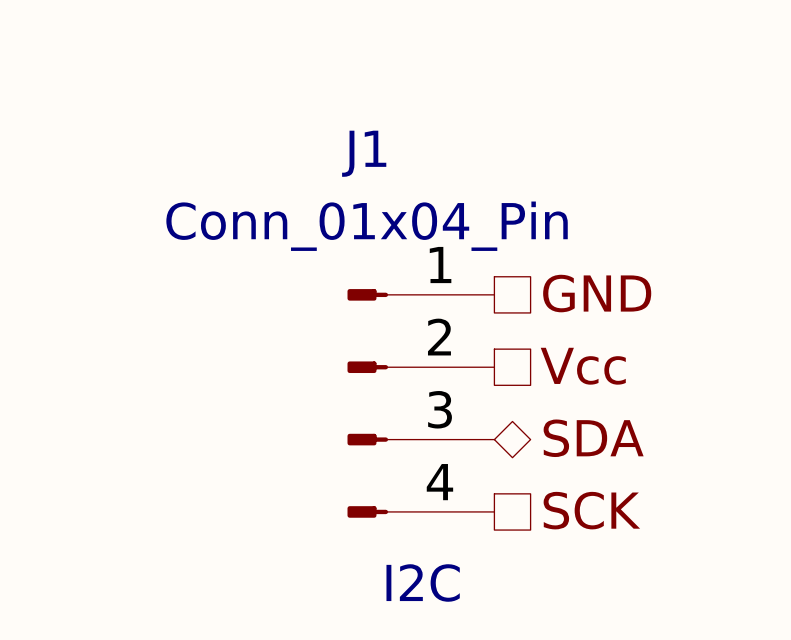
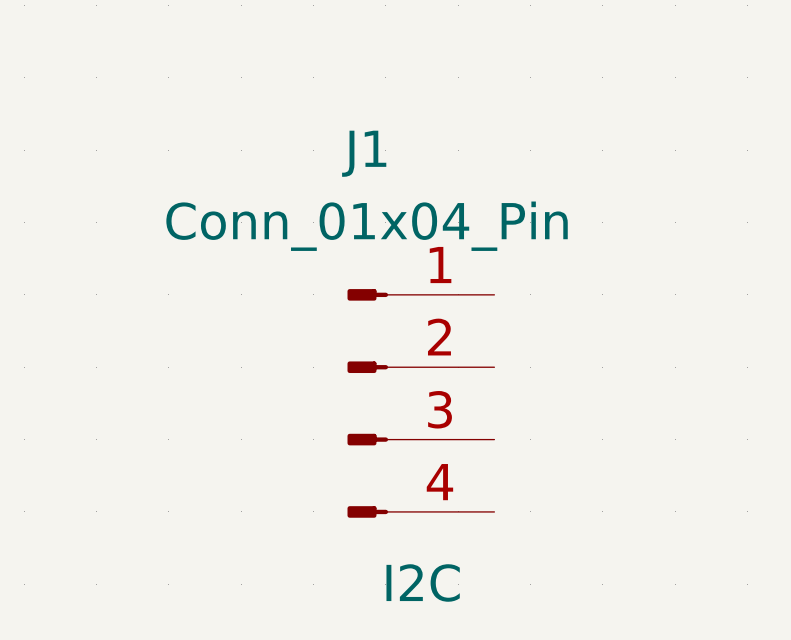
hierarchical label: GND (597, 293) -> none
hierarchical label: Vcc (583, 366) -> none
hierarchical label: SDA (593, 438) -> none
hierarchical label: SCK (591, 510) -> none

